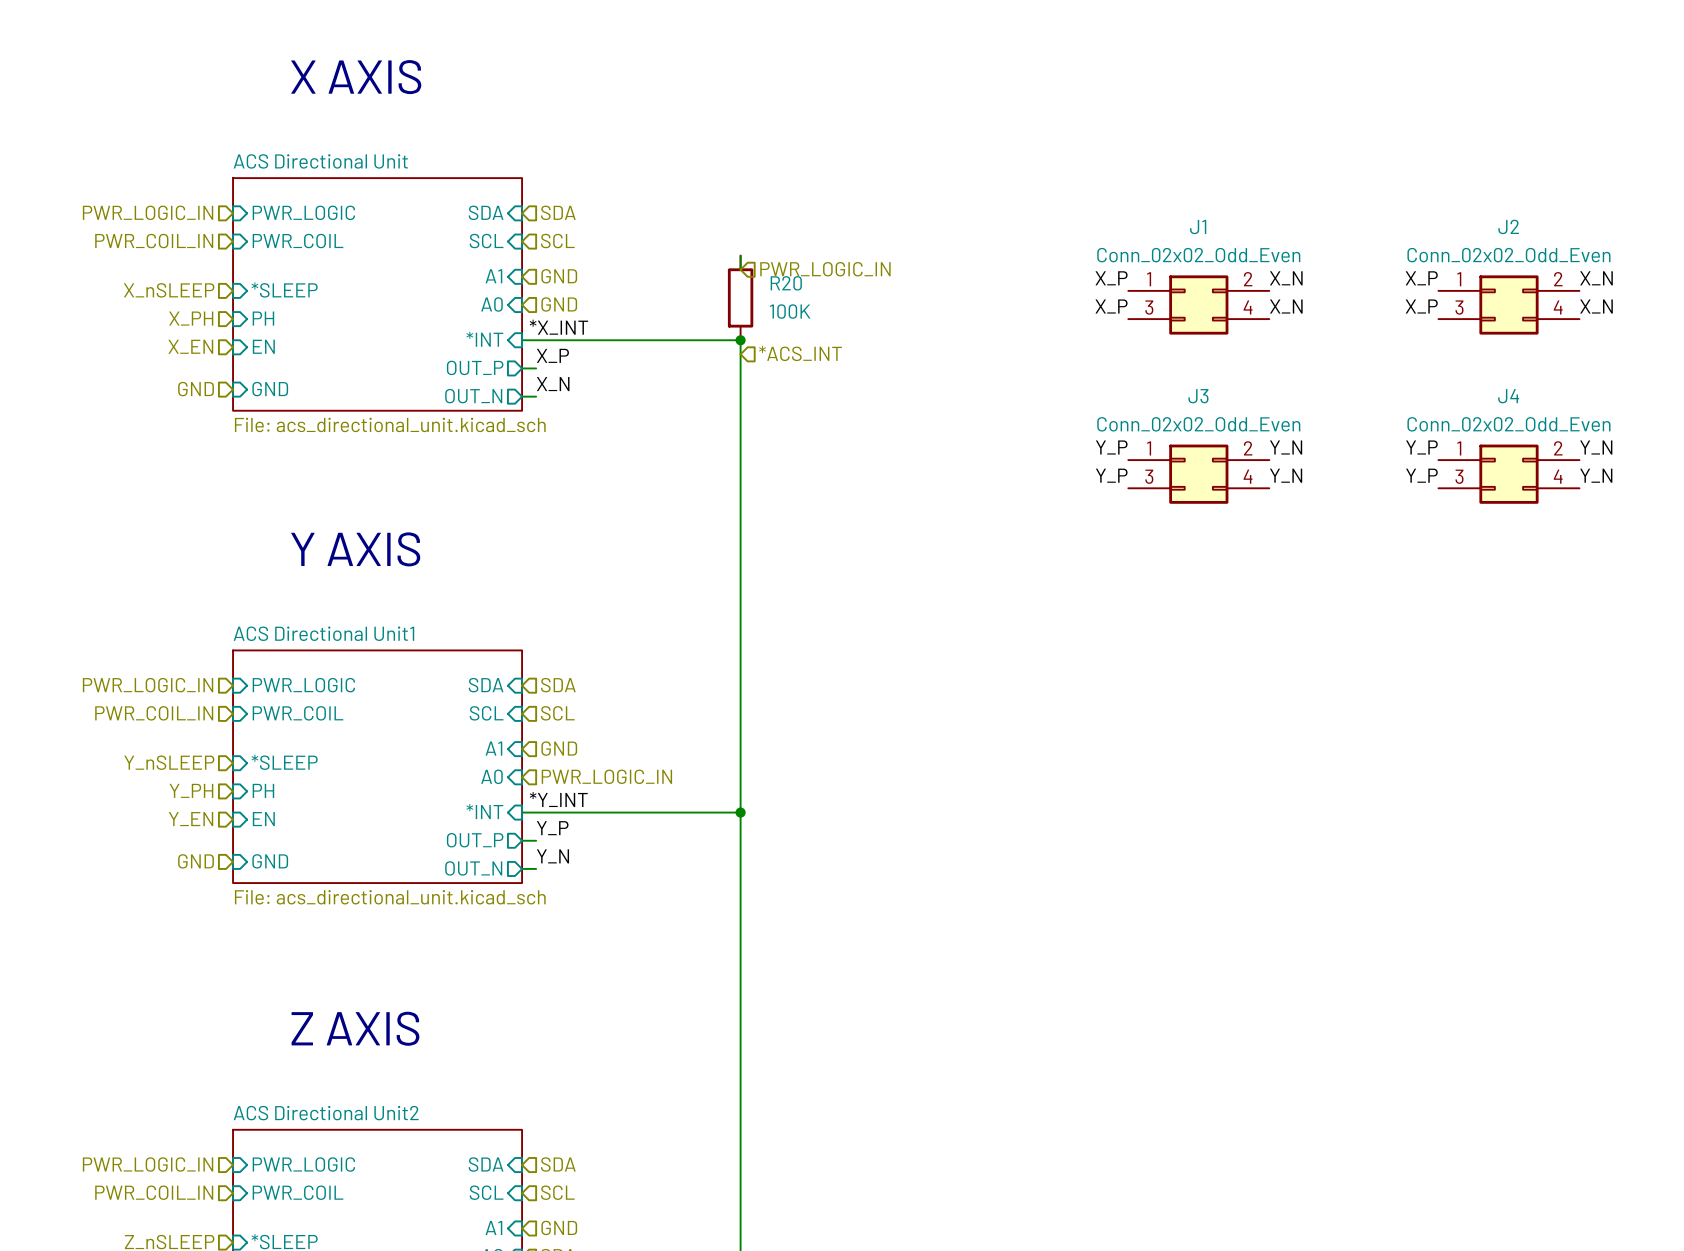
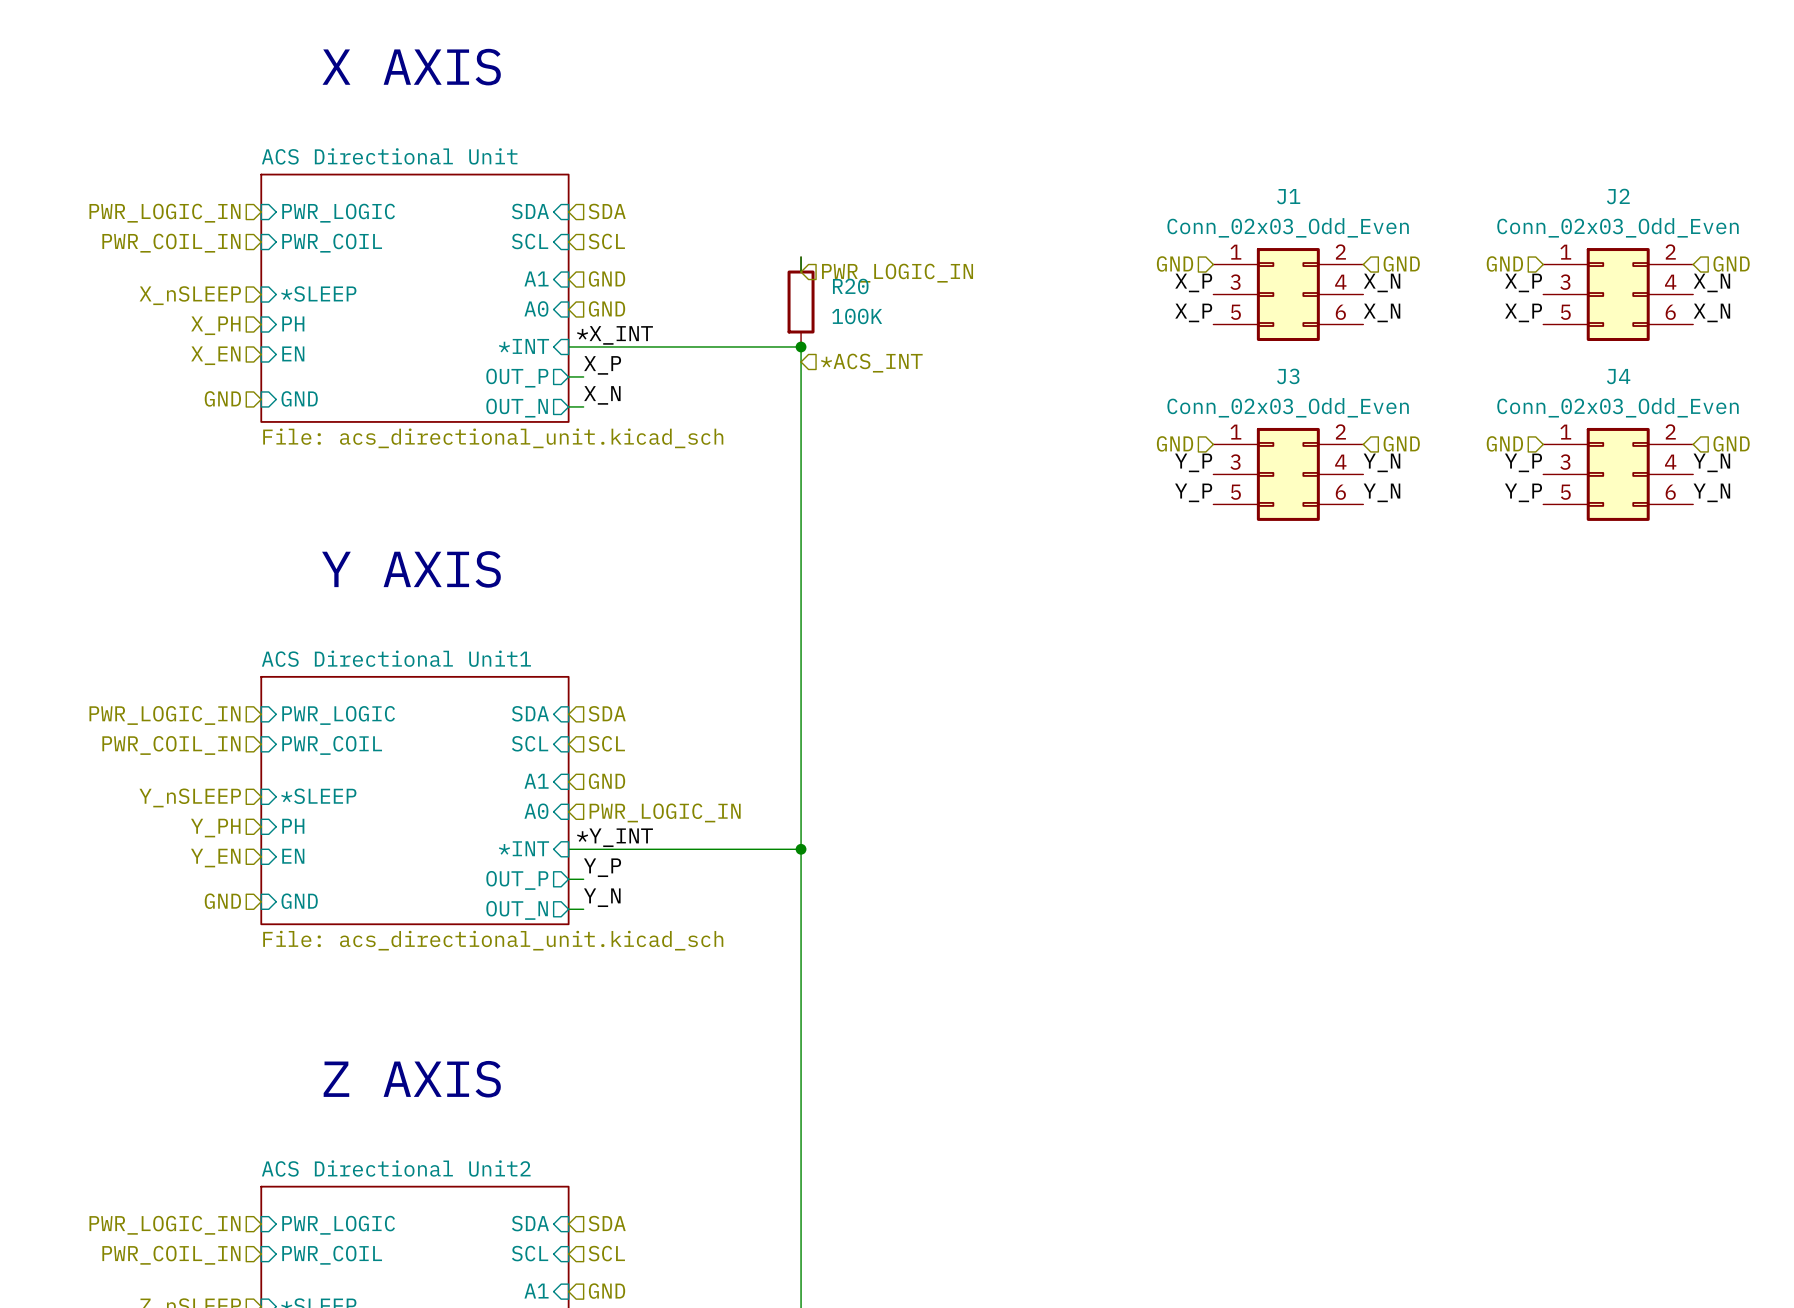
J1 value: Conn_02x02_Odd_Even (1198, 255) -> Conn_02x03_Odd_Even (1288, 227)
J2 value: Conn_02x02_Odd_Even (1508, 255) -> Conn_02x03_Odd_Even (1617, 227)
hierarchical label: none -> GND (1175, 263)
hierarchical label: none -> GND (1401, 263)
hierarchical label: none -> GND (1504, 263)
hierarchical label: none -> GND (1731, 263)
J1 symbol: [1128, 275, 1270, 335] -> [1213, 248, 1364, 341]
J2 symbol: [1438, 275, 1580, 335] -> [1543, 248, 1694, 341]
J3 value: Conn_02x02_Odd_Even (1198, 424) -> Conn_02x03_Odd_Even (1288, 407)
J4 value: Conn_02x02_Odd_Even (1508, 424) -> Conn_02x03_Odd_Even (1617, 407)
hierarchical label: none -> GND (1175, 443)
hierarchical label: none -> GND (1401, 443)
hierarchical label: none -> GND (1504, 443)
hierarchical label: none -> GND (1731, 443)
J3 symbol: [1128, 444, 1270, 504] -> [1213, 427, 1364, 521]
J4 symbol: [1438, 444, 1580, 504] -> [1543, 427, 1694, 521]

